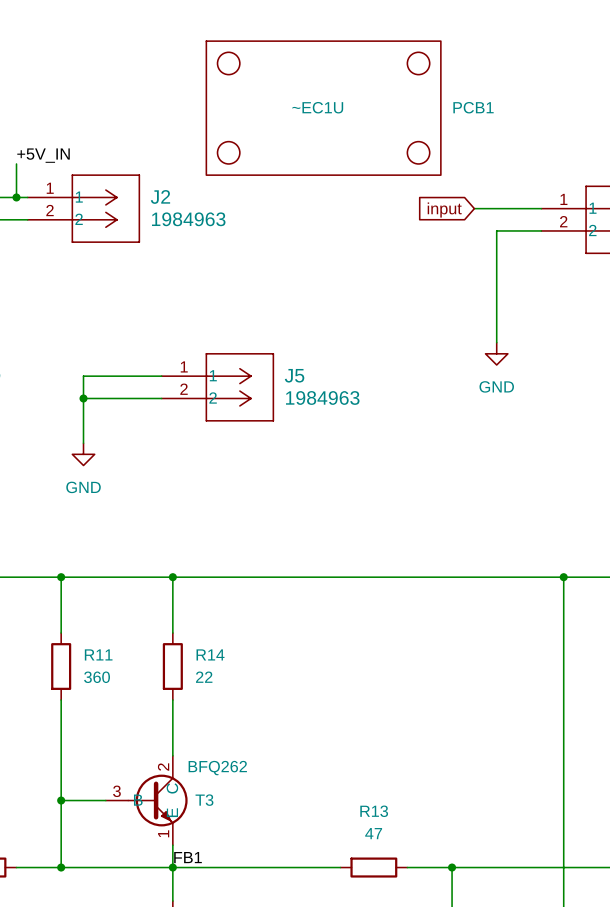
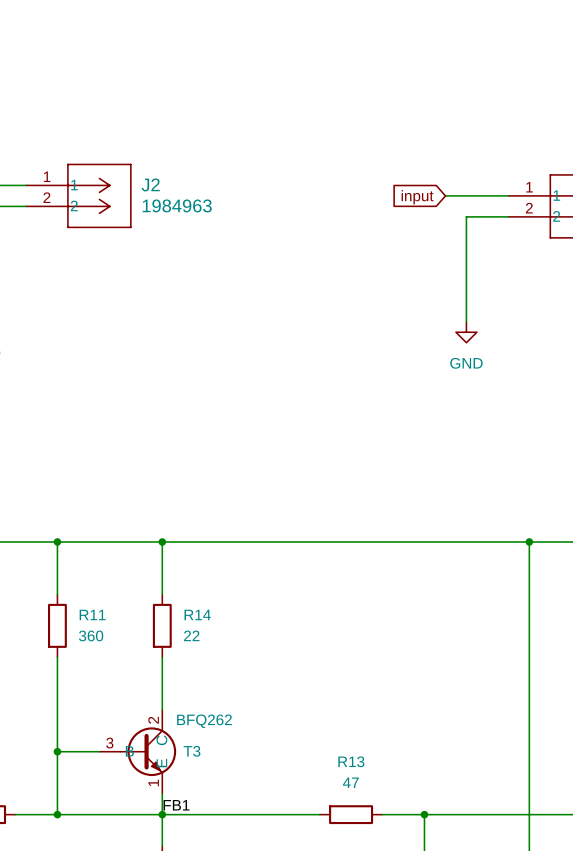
PCB1: ~EC1U (323, 108) -> none
label: +5V_IN (43, 155) -> none
wire: (16, 163) (16, 197) -> none
junction: (16, 197) -> none
wire: (161, 376) (83, 376) (83, 443) -> none
J5: 1984963 (217, 387) -> none
wire: (83, 398) (161, 398) -> none
junction: (83, 398) -> none
power symbol: GND (83, 454) -> none

